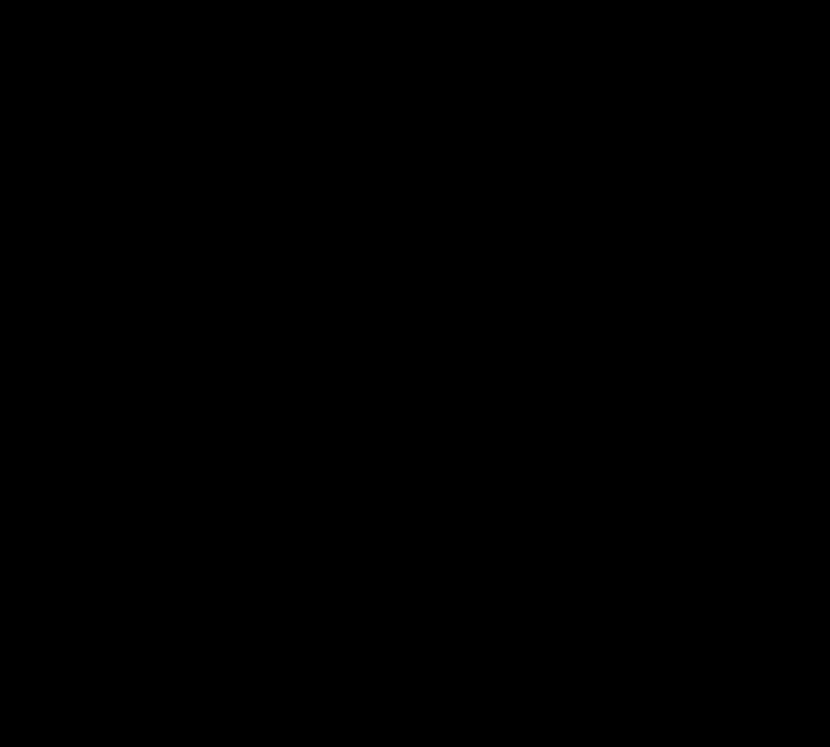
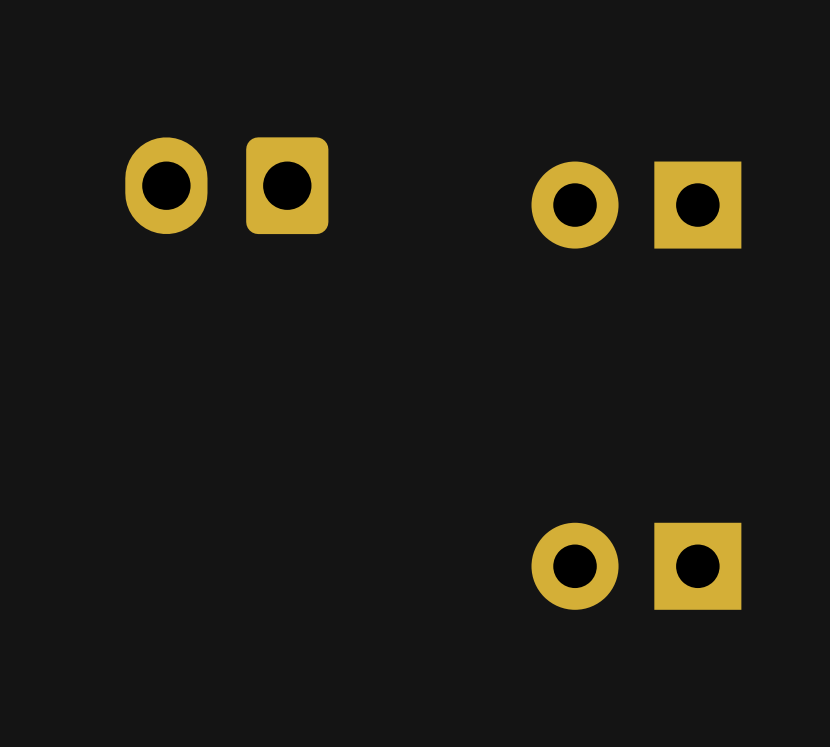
part: none -> (226, 185)
part: none -> (636, 205)
part: none -> (636, 566)

